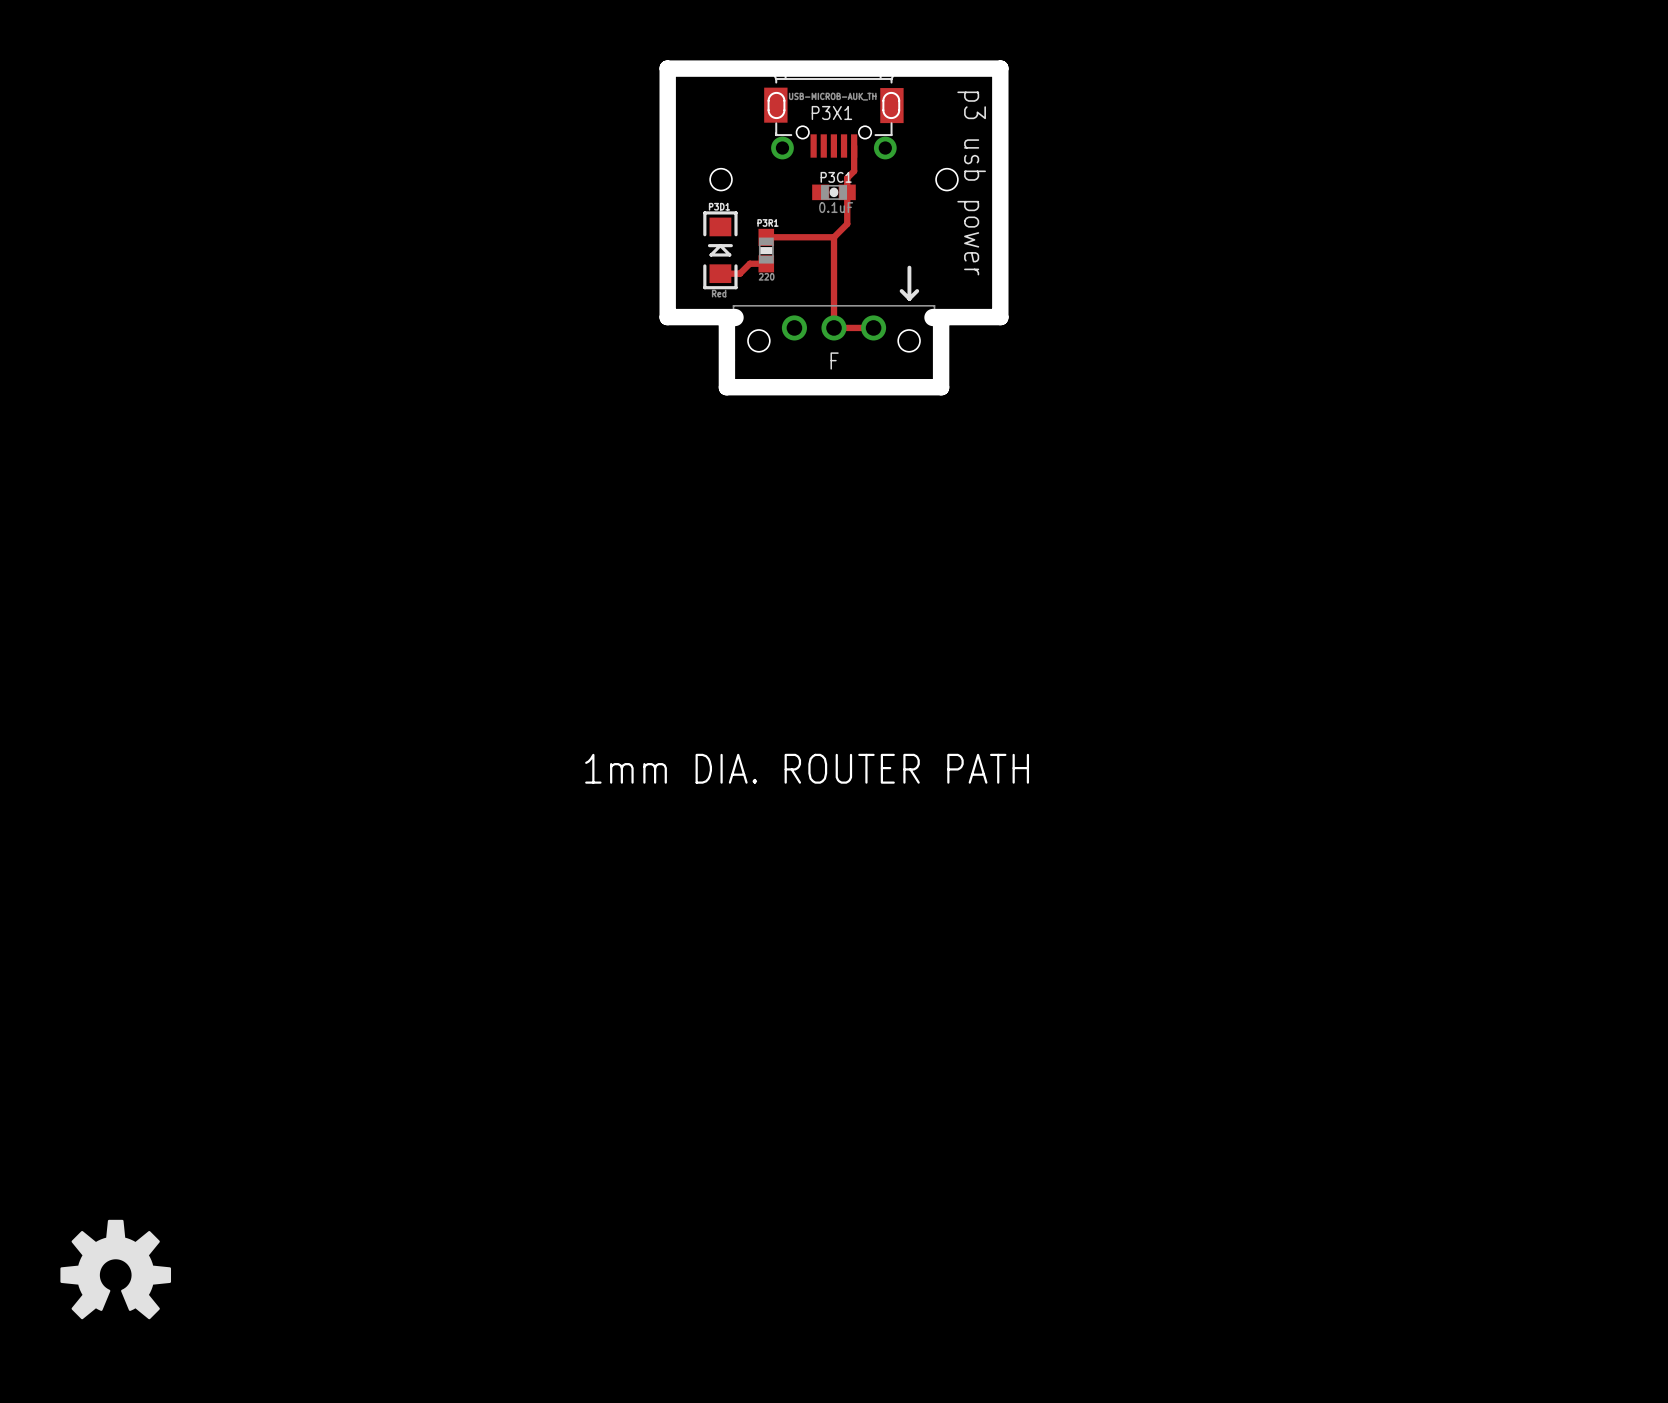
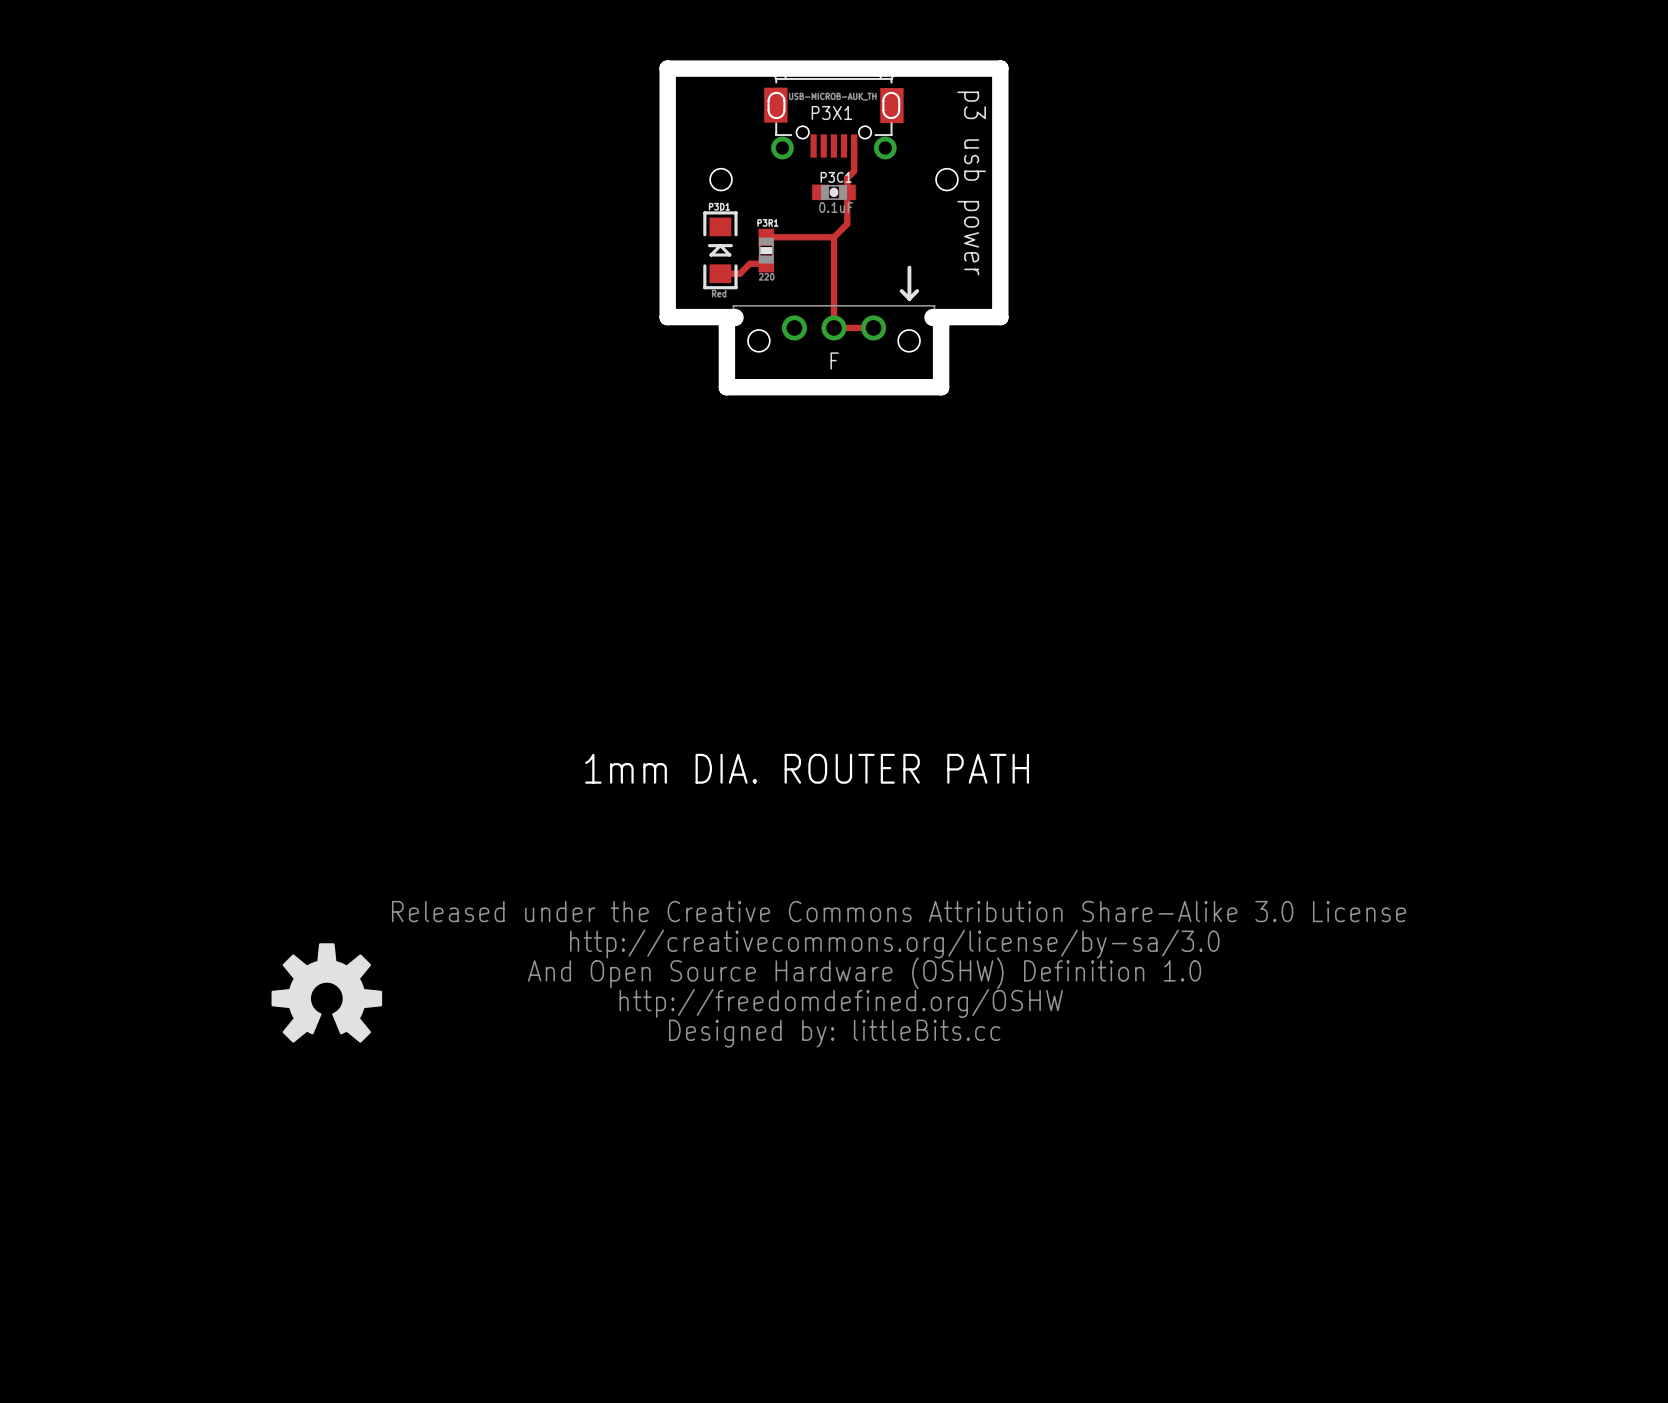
drawing: none -> [391, 900, 1407, 1048]
drawing position: (115, 1269) -> (326, 992)

